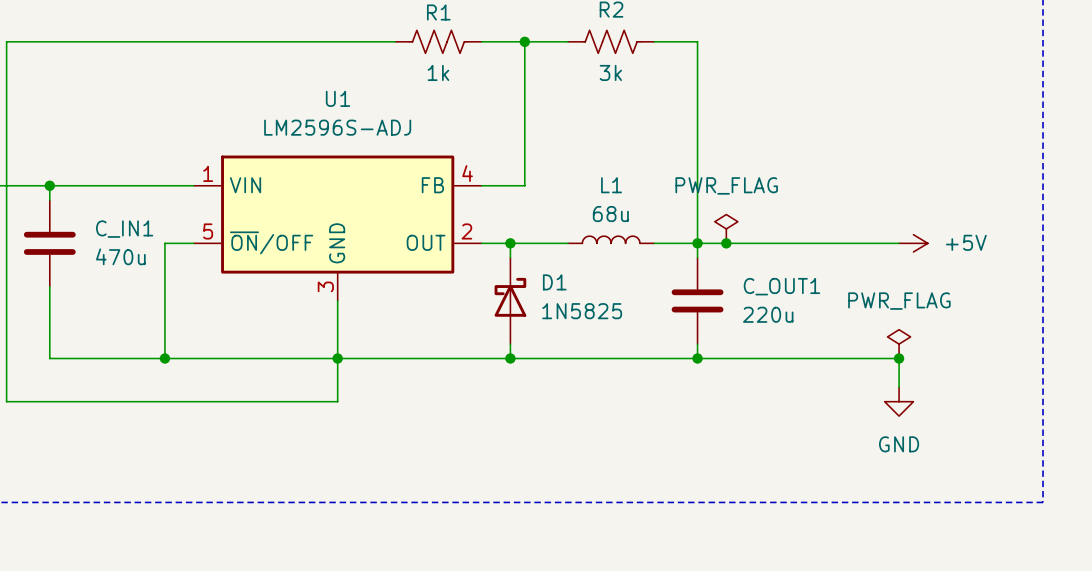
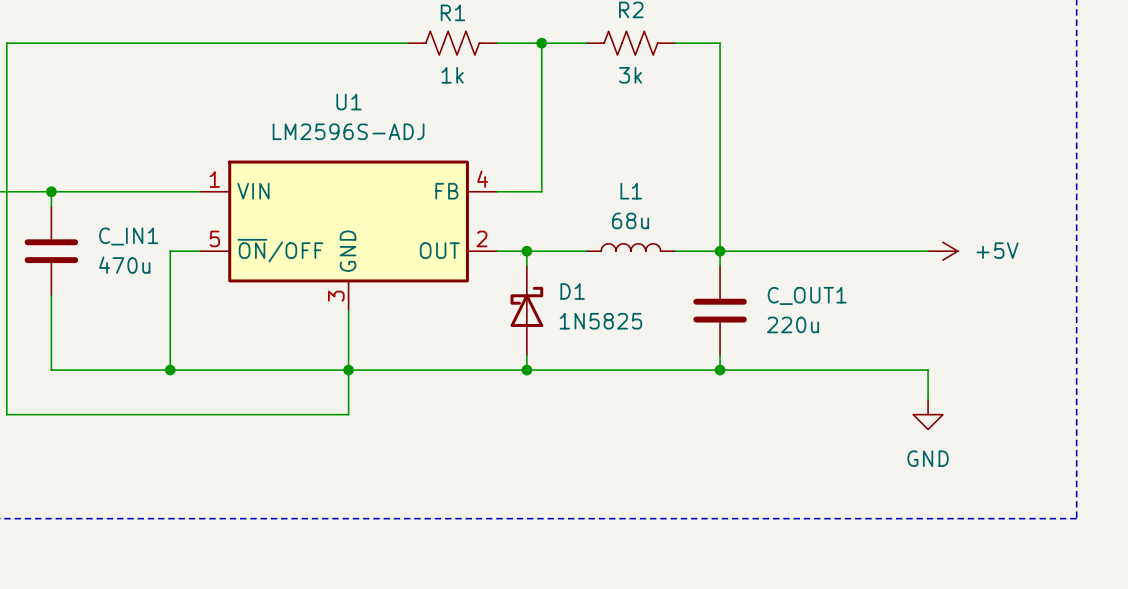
power symbol: PWR_FLAG (726, 228) -> none
junction: (726, 243) -> none
power symbol: PWR_FLAG (899, 344) -> none
junction: (899, 358) -> none

